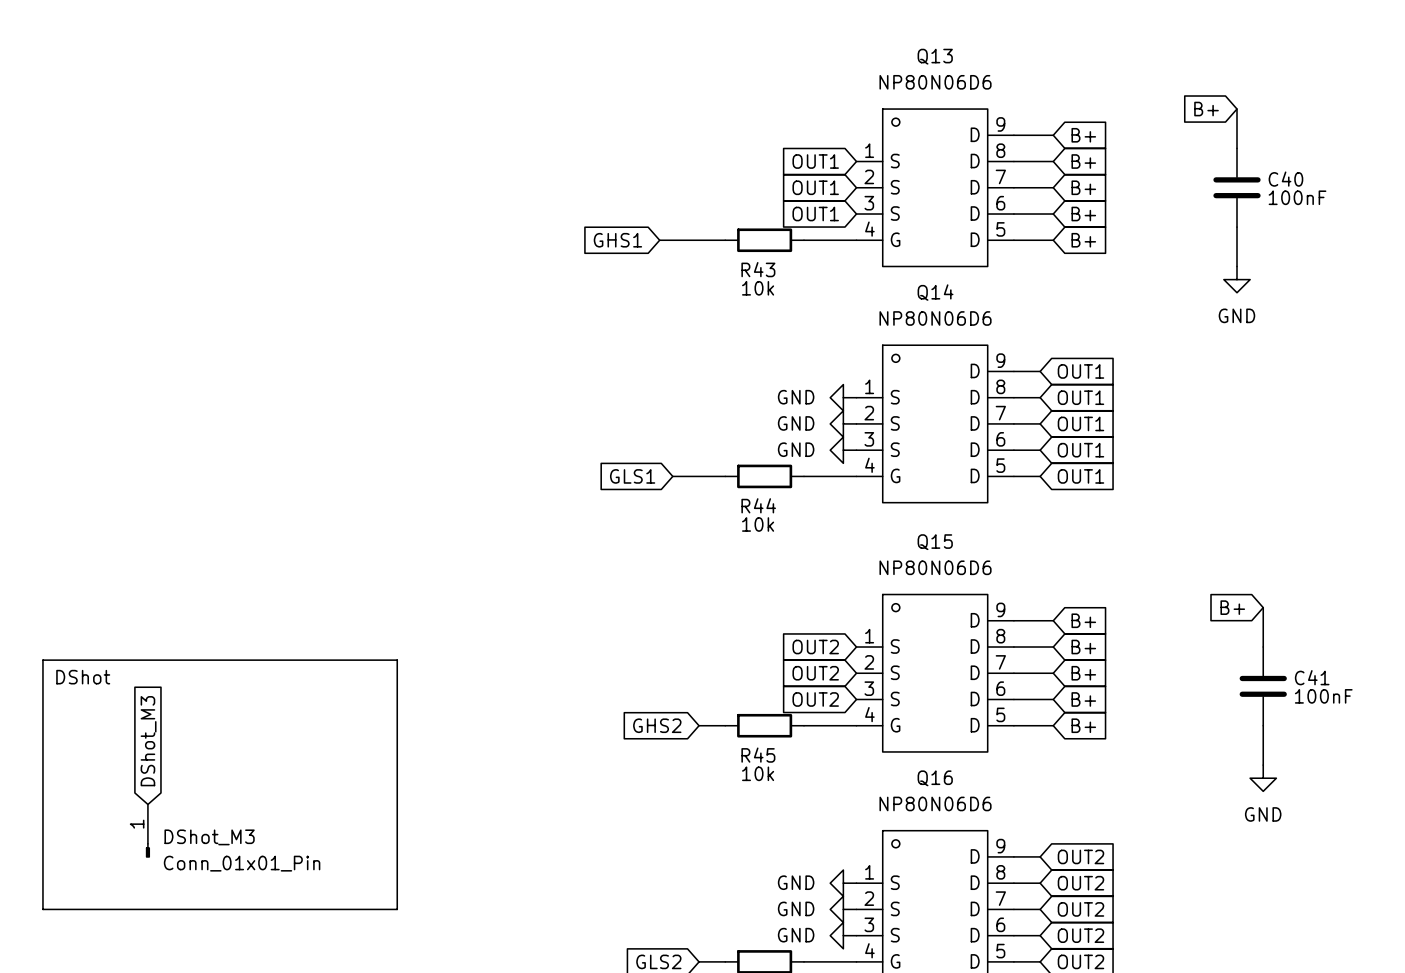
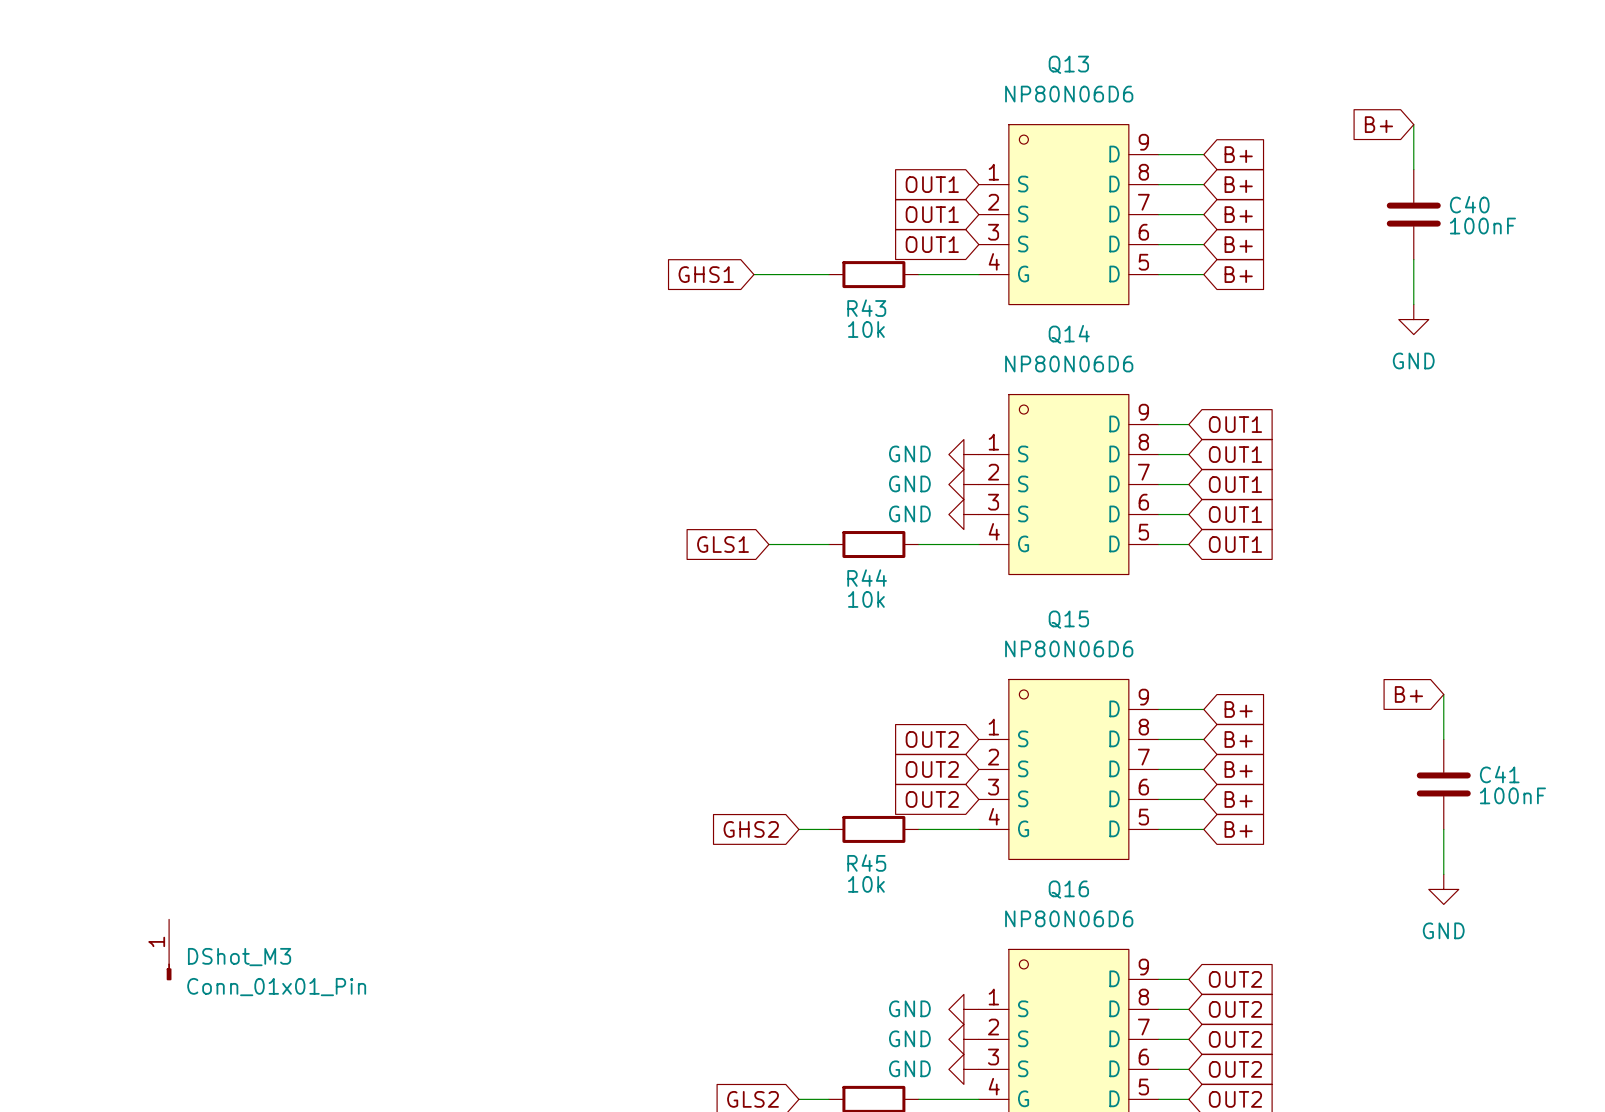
line: (42, 660) (397, 660) (397, 909) (42, 909) (42, 660) -> none
text: DShot (83, 677) -> none
global label: DShot_M3 (148, 741) -> none

